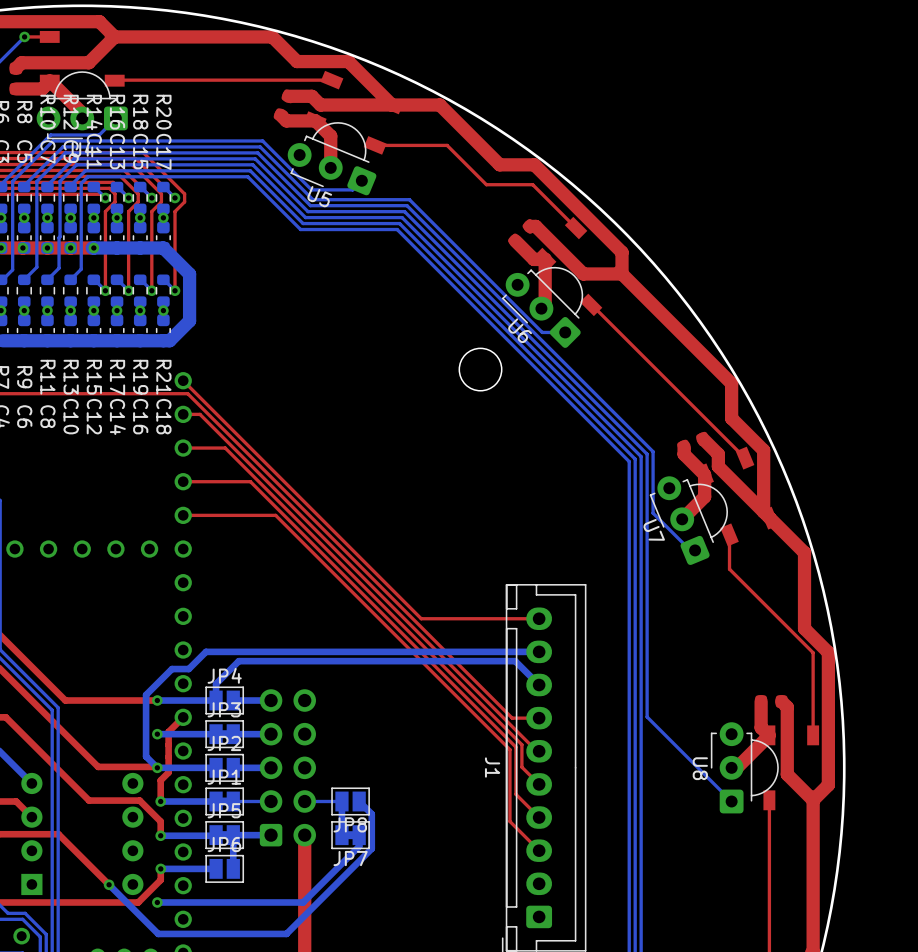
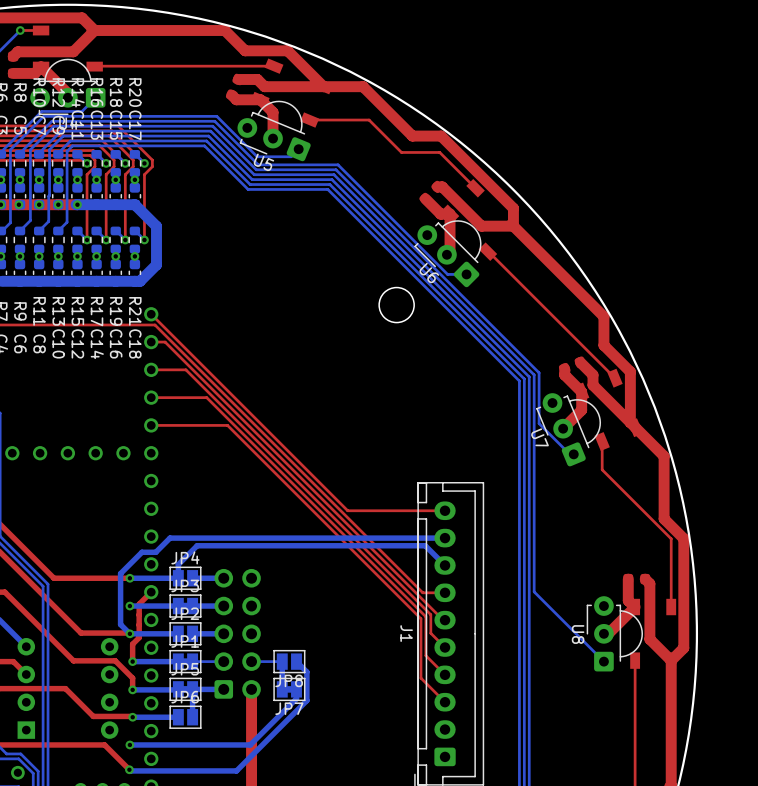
top track: (58, 834) (109, 884) -> (48, 688) (65, 688) (93, 716) (132, 716)
top track: (160, 868) (160, 879) (138, 902) (126, 902) -> (129, 769) (104, 744)
bottom track: (109, 884) (156, 932) -> none
via position: (109, 884) -> (129, 769)

